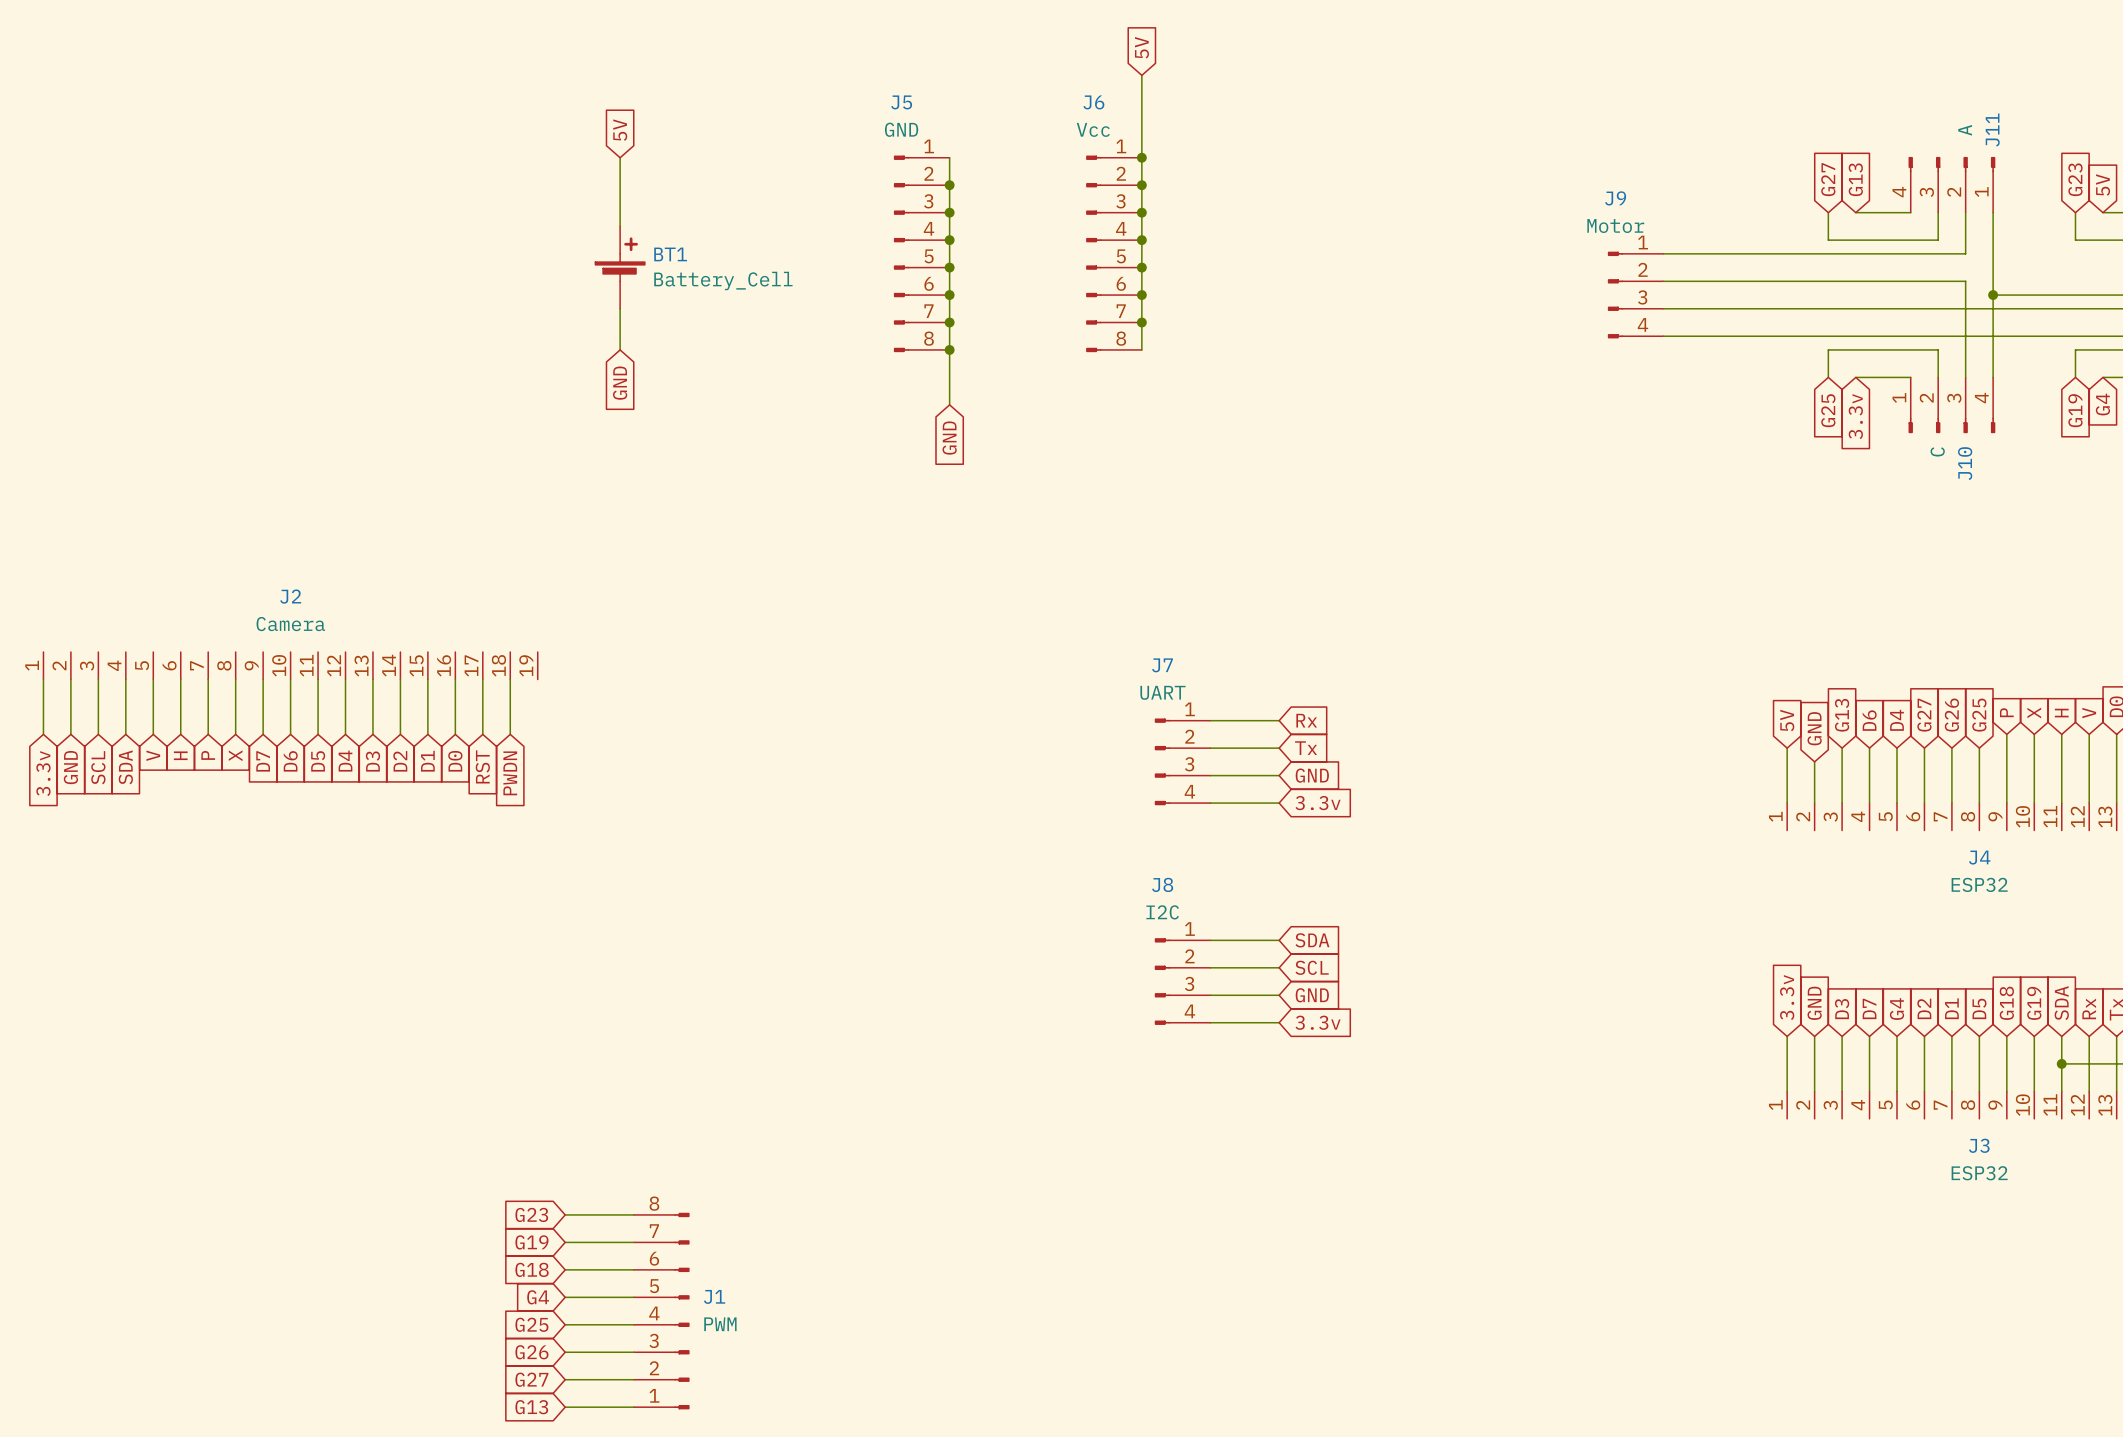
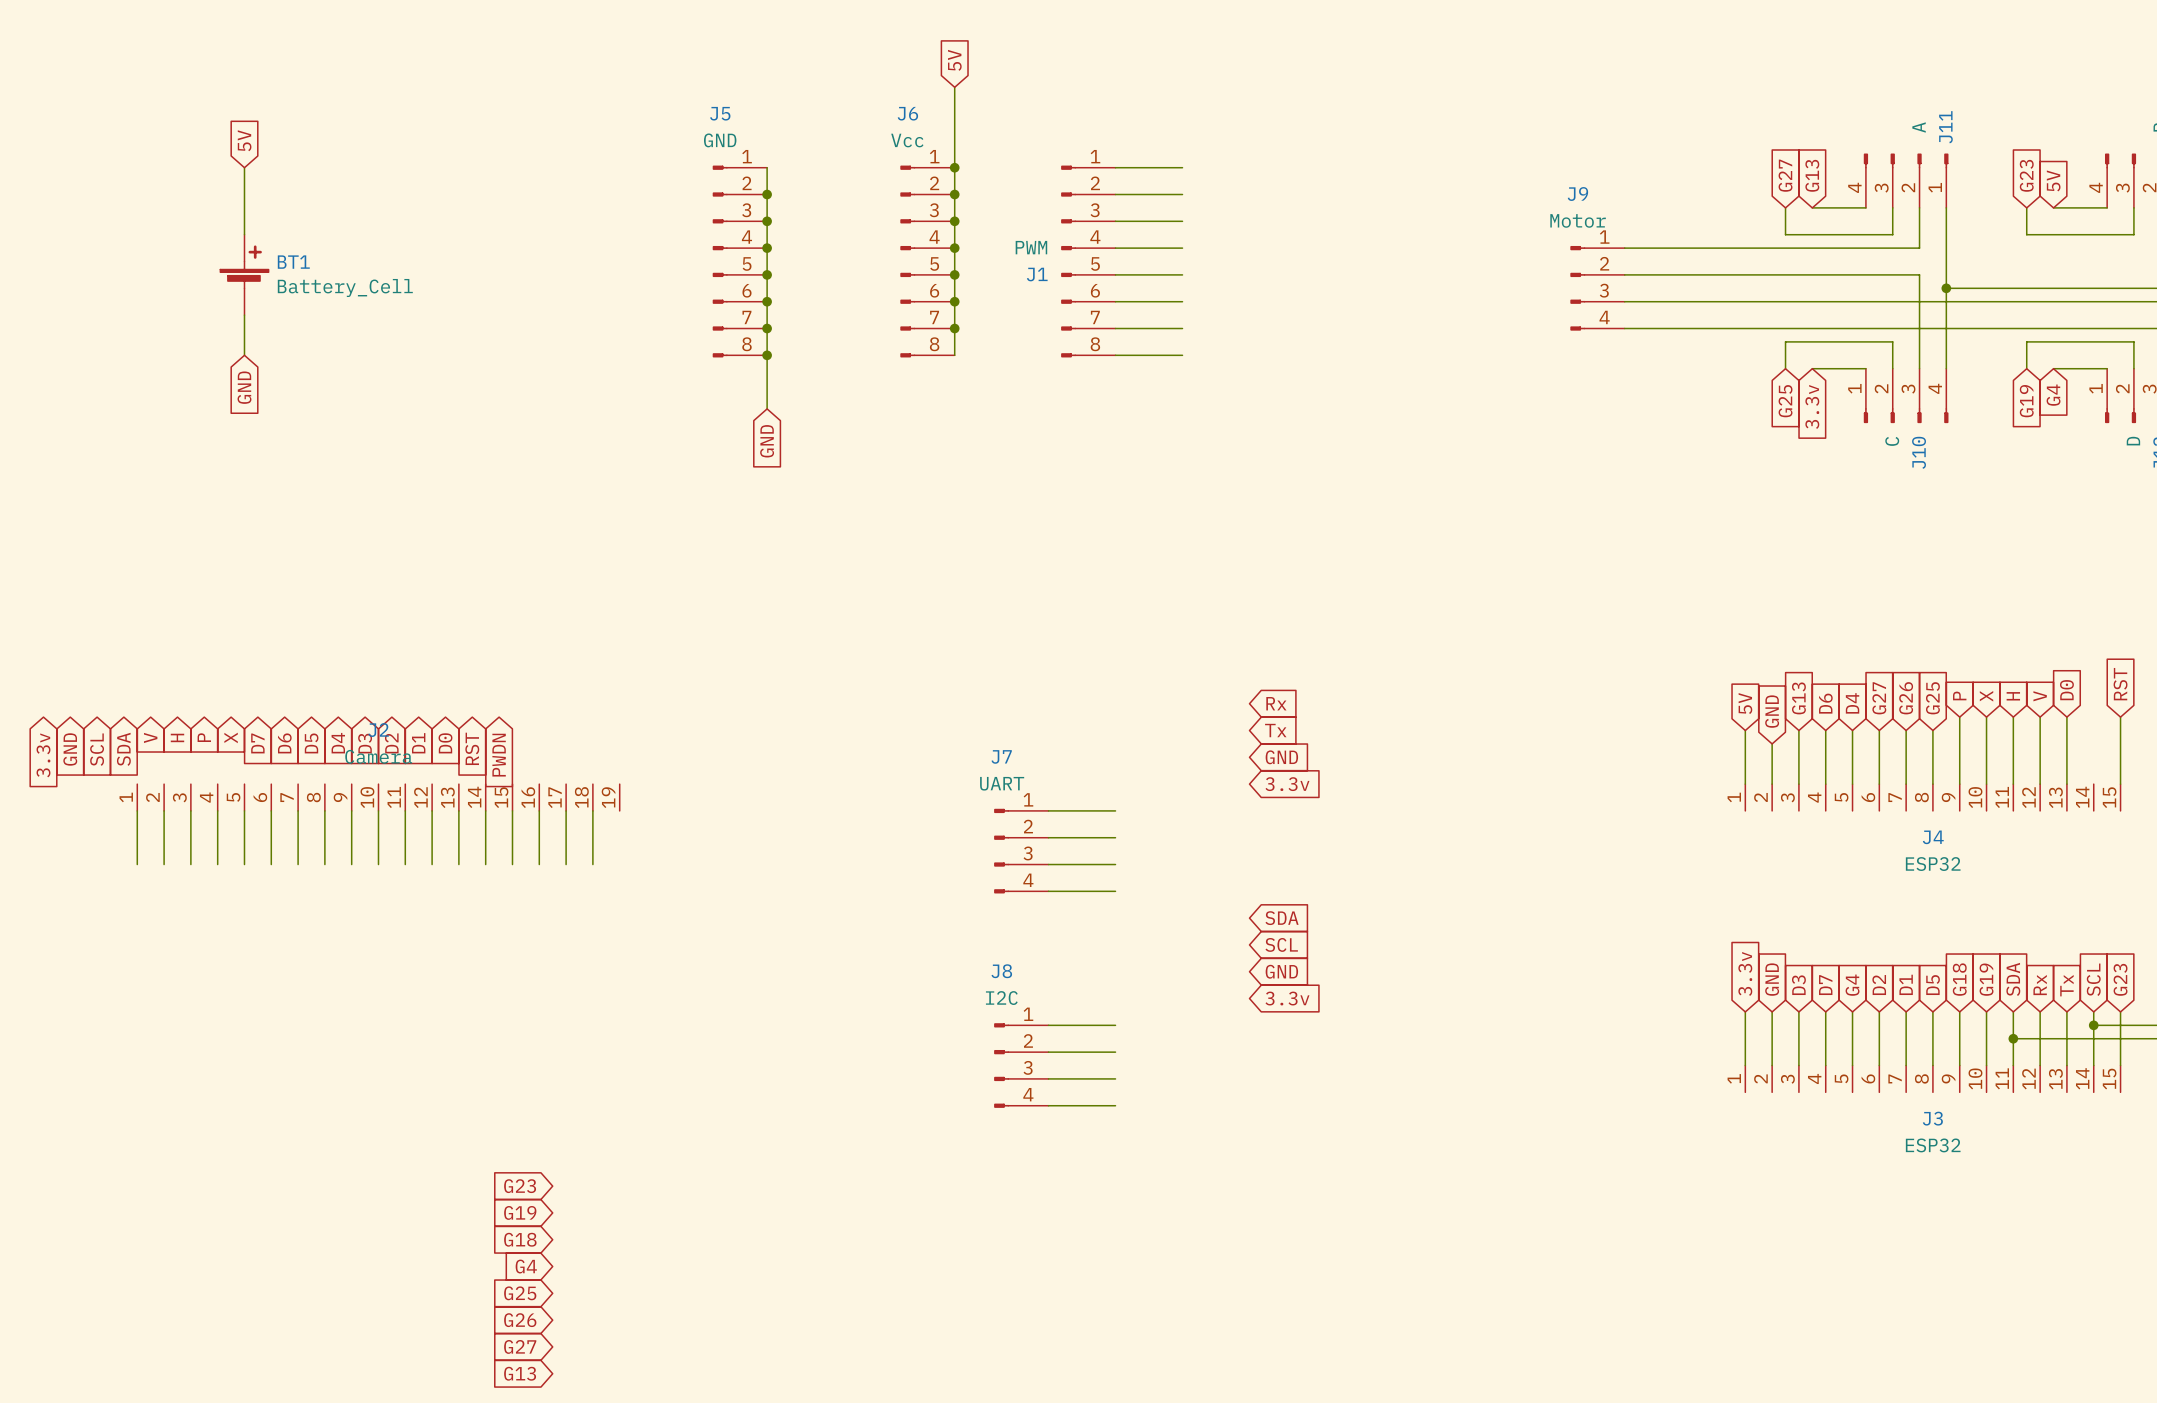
global label position: 5V (1141, 47) -> 5V (954, 60)
wire: (1141, 75) (1141, 349) -> (954, 87) (954, 355)
global label: 5V (620, 130) -> none
global label: none -> 5V (244, 140)
wire: (620, 157) (620, 226) -> none
wire: (949, 157) (949, 404) -> (767, 167) (767, 408)
junction: (1141, 157) -> none
wire: none -> (244, 167) (244, 234)
junction: none -> (954, 167)
wire: none -> (1115, 167) (1182, 167)
junction: (949, 185) -> none
junction: (1141, 185) -> none
junction: none -> (767, 194)
junction: none -> (954, 194)
wire: none -> (1115, 194) (1182, 194)
junction: (949, 212) -> none
junction: (1141, 212) -> none
junction: none -> (767, 221)
junction: none -> (954, 221)
wire: none -> (1115, 221) (1182, 221)
junction: (949, 240) -> none
junction: (1141, 240) -> none
junction: none -> (767, 248)
J5 position: (921, 253) -> (739, 261)
junction: none -> (954, 248)
J6 position: (1113, 253) -> (927, 261)
wire: none -> (1115, 248) (1182, 248)
BT1 position: (620, 267) -> (244, 274)
junction: (949, 267) -> none
junction: (1141, 267) -> none
junction: none -> (767, 274)
junction: none -> (954, 274)
wire: none -> (1115, 274) (1182, 274)
junction: (949, 295) -> none
junction: (1141, 295) -> none
wire: (620, 308) (620, 349) -> none
junction: none -> (767, 301)
junction: none -> (954, 301)
wire: none -> (1115, 301) (1182, 301)
wire: none -> (244, 315) (244, 355)
junction: (949, 322) -> none
junction: (1141, 322) -> none
junction: none -> (767, 328)
junction: none -> (954, 328)
wire: none -> (1115, 328) (1182, 328)
junction: (949, 349) -> none
junction: none -> (767, 355)
wire: none -> (1115, 355) (1182, 355)
global label: GND (620, 383) -> none
global label: none -> GND (244, 387)
global label: GND (949, 438) -> none
global label: none -> GND (767, 441)
J2 position: (290, 665) -> (378, 797)
wire: (43, 679) (43, 734) -> (137, 810) (137, 864)
wire: (70, 679) (70, 734) -> (164, 810) (164, 864)
wire: (98, 679) (98, 734) -> (190, 810) (190, 864)
wire: (125, 679) (125, 734) -> (217, 810) (217, 864)
wire: (153, 679) (153, 734) -> (244, 810) (244, 864)
wire: (180, 679) (180, 734) -> (271, 810) (271, 864)
wire: (208, 679) (208, 734) -> (298, 810) (298, 864)
wire: (235, 679) (235, 734) -> (324, 810) (324, 864)
wire: (263, 679) (263, 734) -> (351, 810) (351, 864)
wire: (290, 679) (290, 734) -> (378, 810) (378, 864)
wire: (318, 679) (318, 734) -> (405, 810) (405, 864)
wire: (345, 679) (345, 734) -> (432, 810) (432, 864)
wire: (372, 679) (372, 734) -> (458, 810) (458, 864)
wire: (400, 679) (400, 734) -> (485, 810) (485, 864)
wire: (427, 679) (427, 734) -> (512, 810) (512, 864)
wire: (455, 679) (455, 734) -> (539, 810) (539, 864)
wire: (482, 679) (482, 734) -> (566, 810) (566, 864)
wire: (510, 679) (510, 734) -> (592, 810) (592, 864)
wire: (1210, 720) (1279, 720) -> (1048, 810) (1115, 810)
wire: (1210, 748) (1279, 748) -> (1048, 837) (1115, 837)
J7 position: (1182, 761) -> (1021, 851)
wire: (1210, 775) (1279, 775) -> (1048, 864) (1115, 864)
wire: (1210, 803) (1279, 803) -> (1048, 891) (1115, 891)
wire: (1210, 940) (1279, 940) -> (1048, 1025) (1115, 1025)
wire: (1210, 967) (1279, 967) -> (1048, 1052) (1115, 1052)
J8 position: (1182, 981) -> (1021, 1065)
wire: (1210, 995) (1279, 995) -> (1048, 1078) (1115, 1078)
wire: (1210, 1022) (1279, 1022) -> (1048, 1105) (1115, 1105)
wire: (565, 1214) (633, 1214) -> none
wire: (565, 1242) (633, 1242) -> none
wire: (565, 1269) (633, 1269) -> none
wire: (565, 1297) (633, 1297) -> none
J1 position: (661, 1311) -> (1088, 261)
J1 rotation: 0° (681, 1311) -> 180° (1068, 261)
wire: (565, 1324) (633, 1324) -> none
wire: (565, 1352) (633, 1352) -> none
wire: (565, 1379) (633, 1379) -> none
wire: (565, 1407) (633, 1407) -> none

